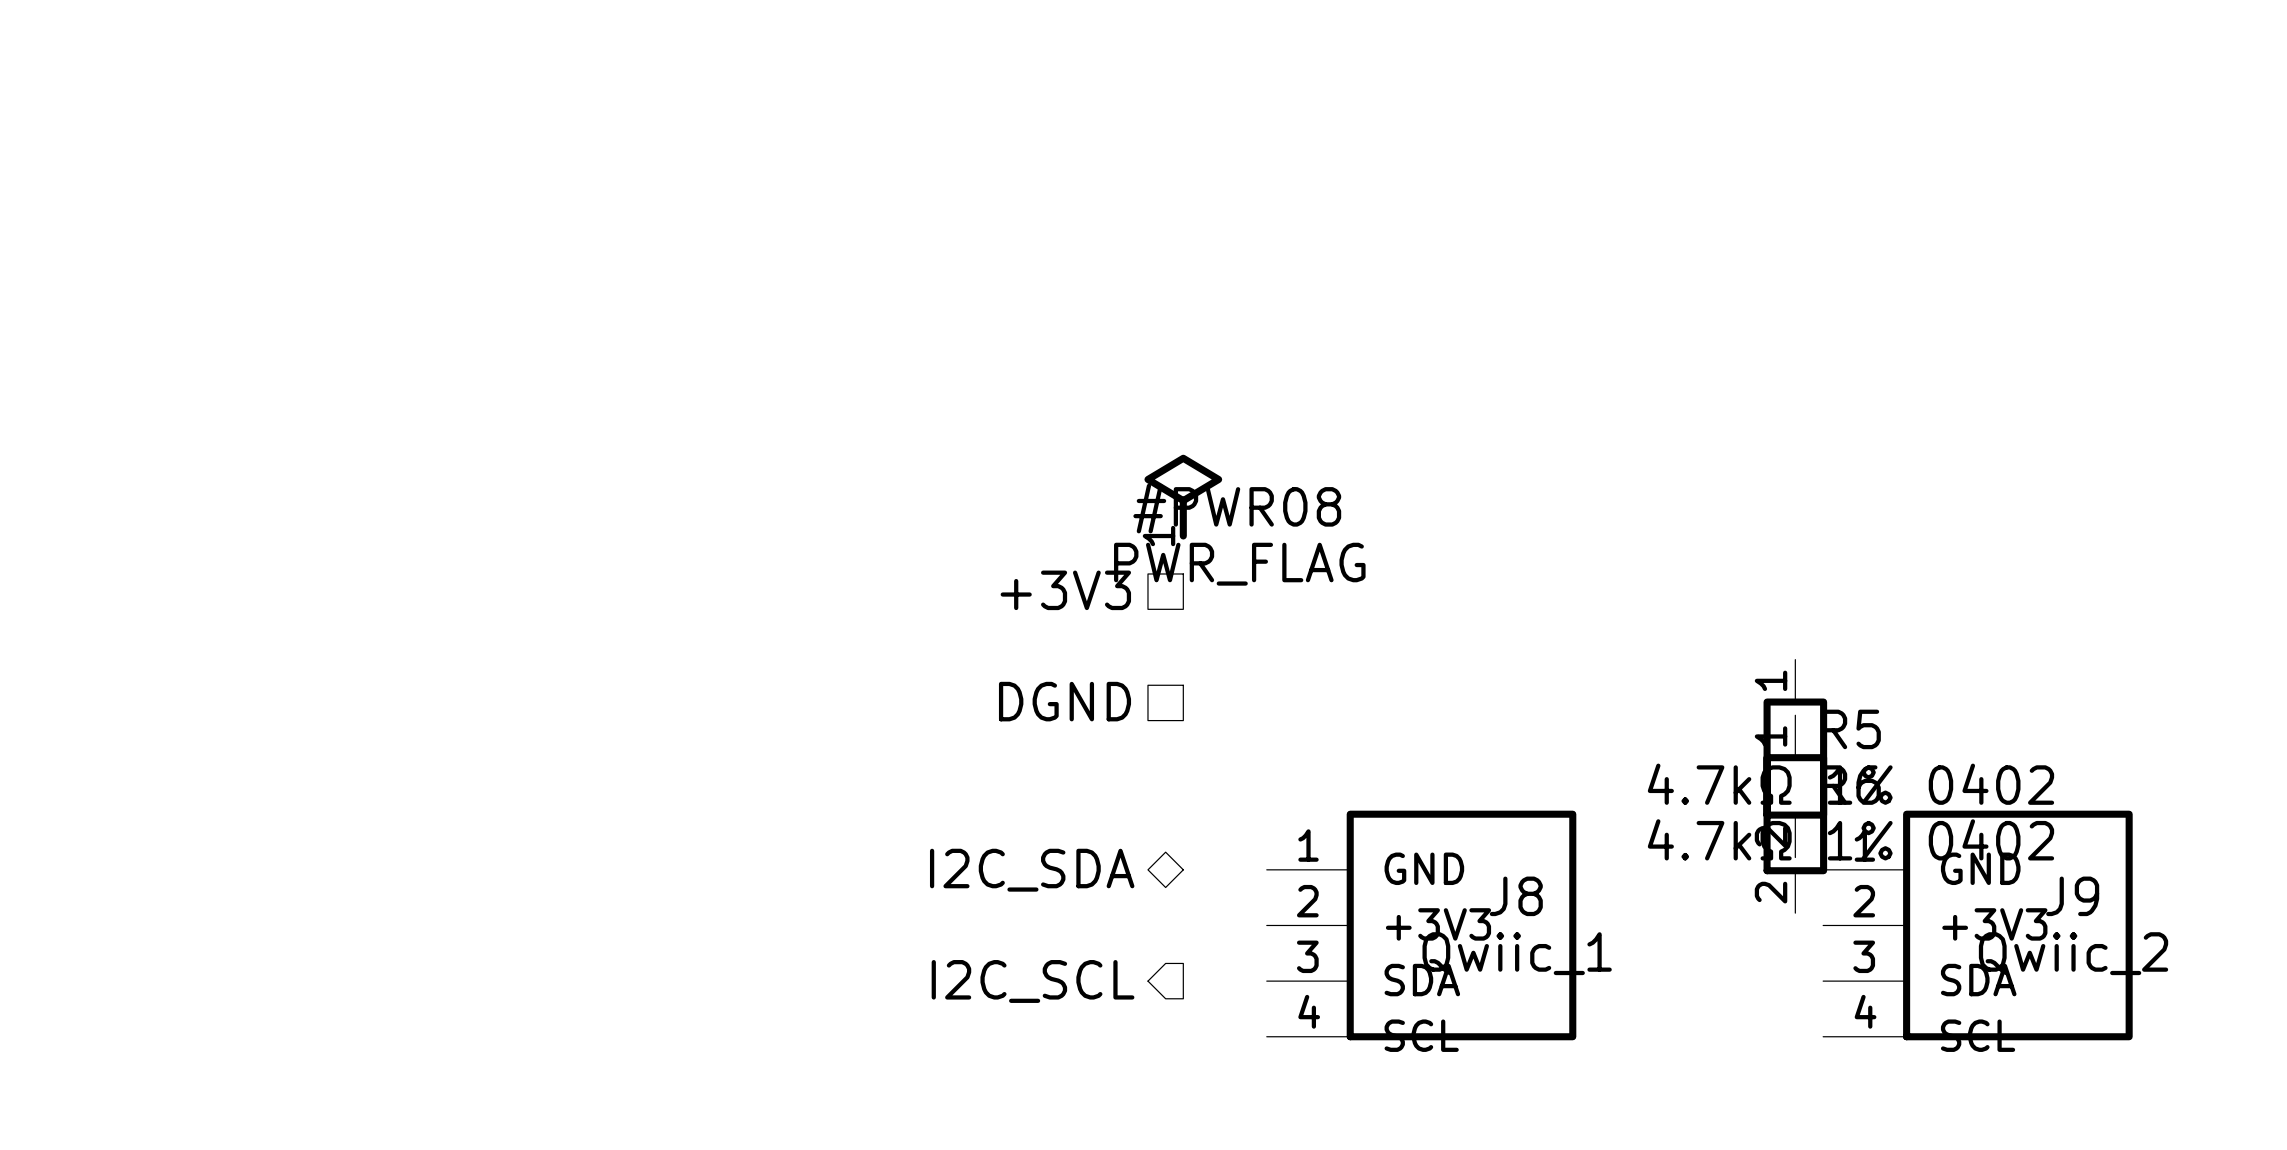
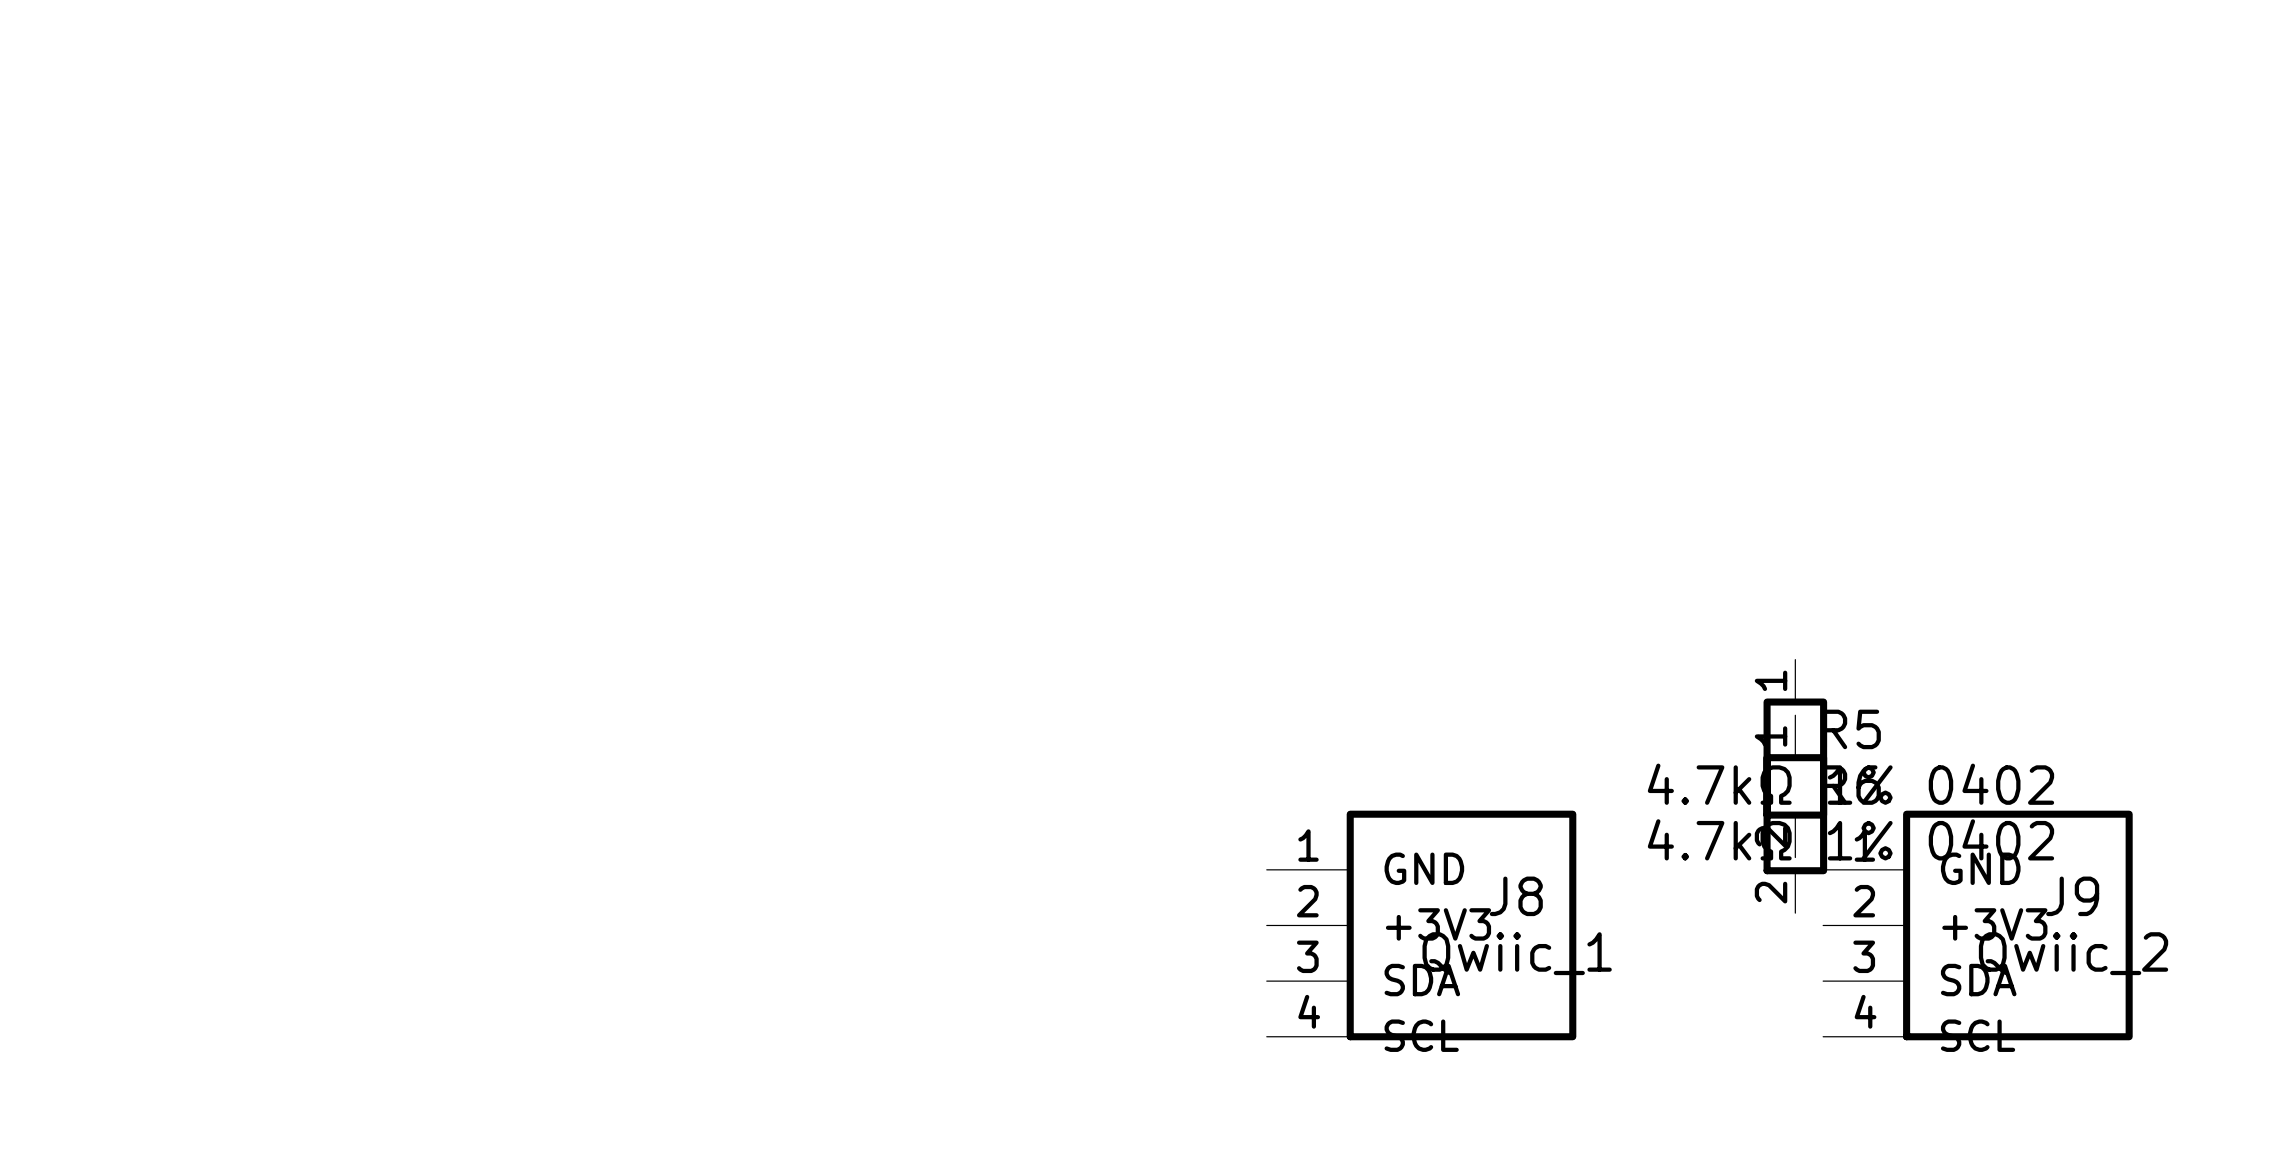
#PWR08: PWR_FLAG (1183, 497) -> none
hierarchical label: +3V3 (1065, 590) -> none
hierarchical label: DGND (1065, 701) -> none
hierarchical label: I2C_SDA (1032, 870) -> none
hierarchical label: I2C_SCL (1033, 981) -> none

